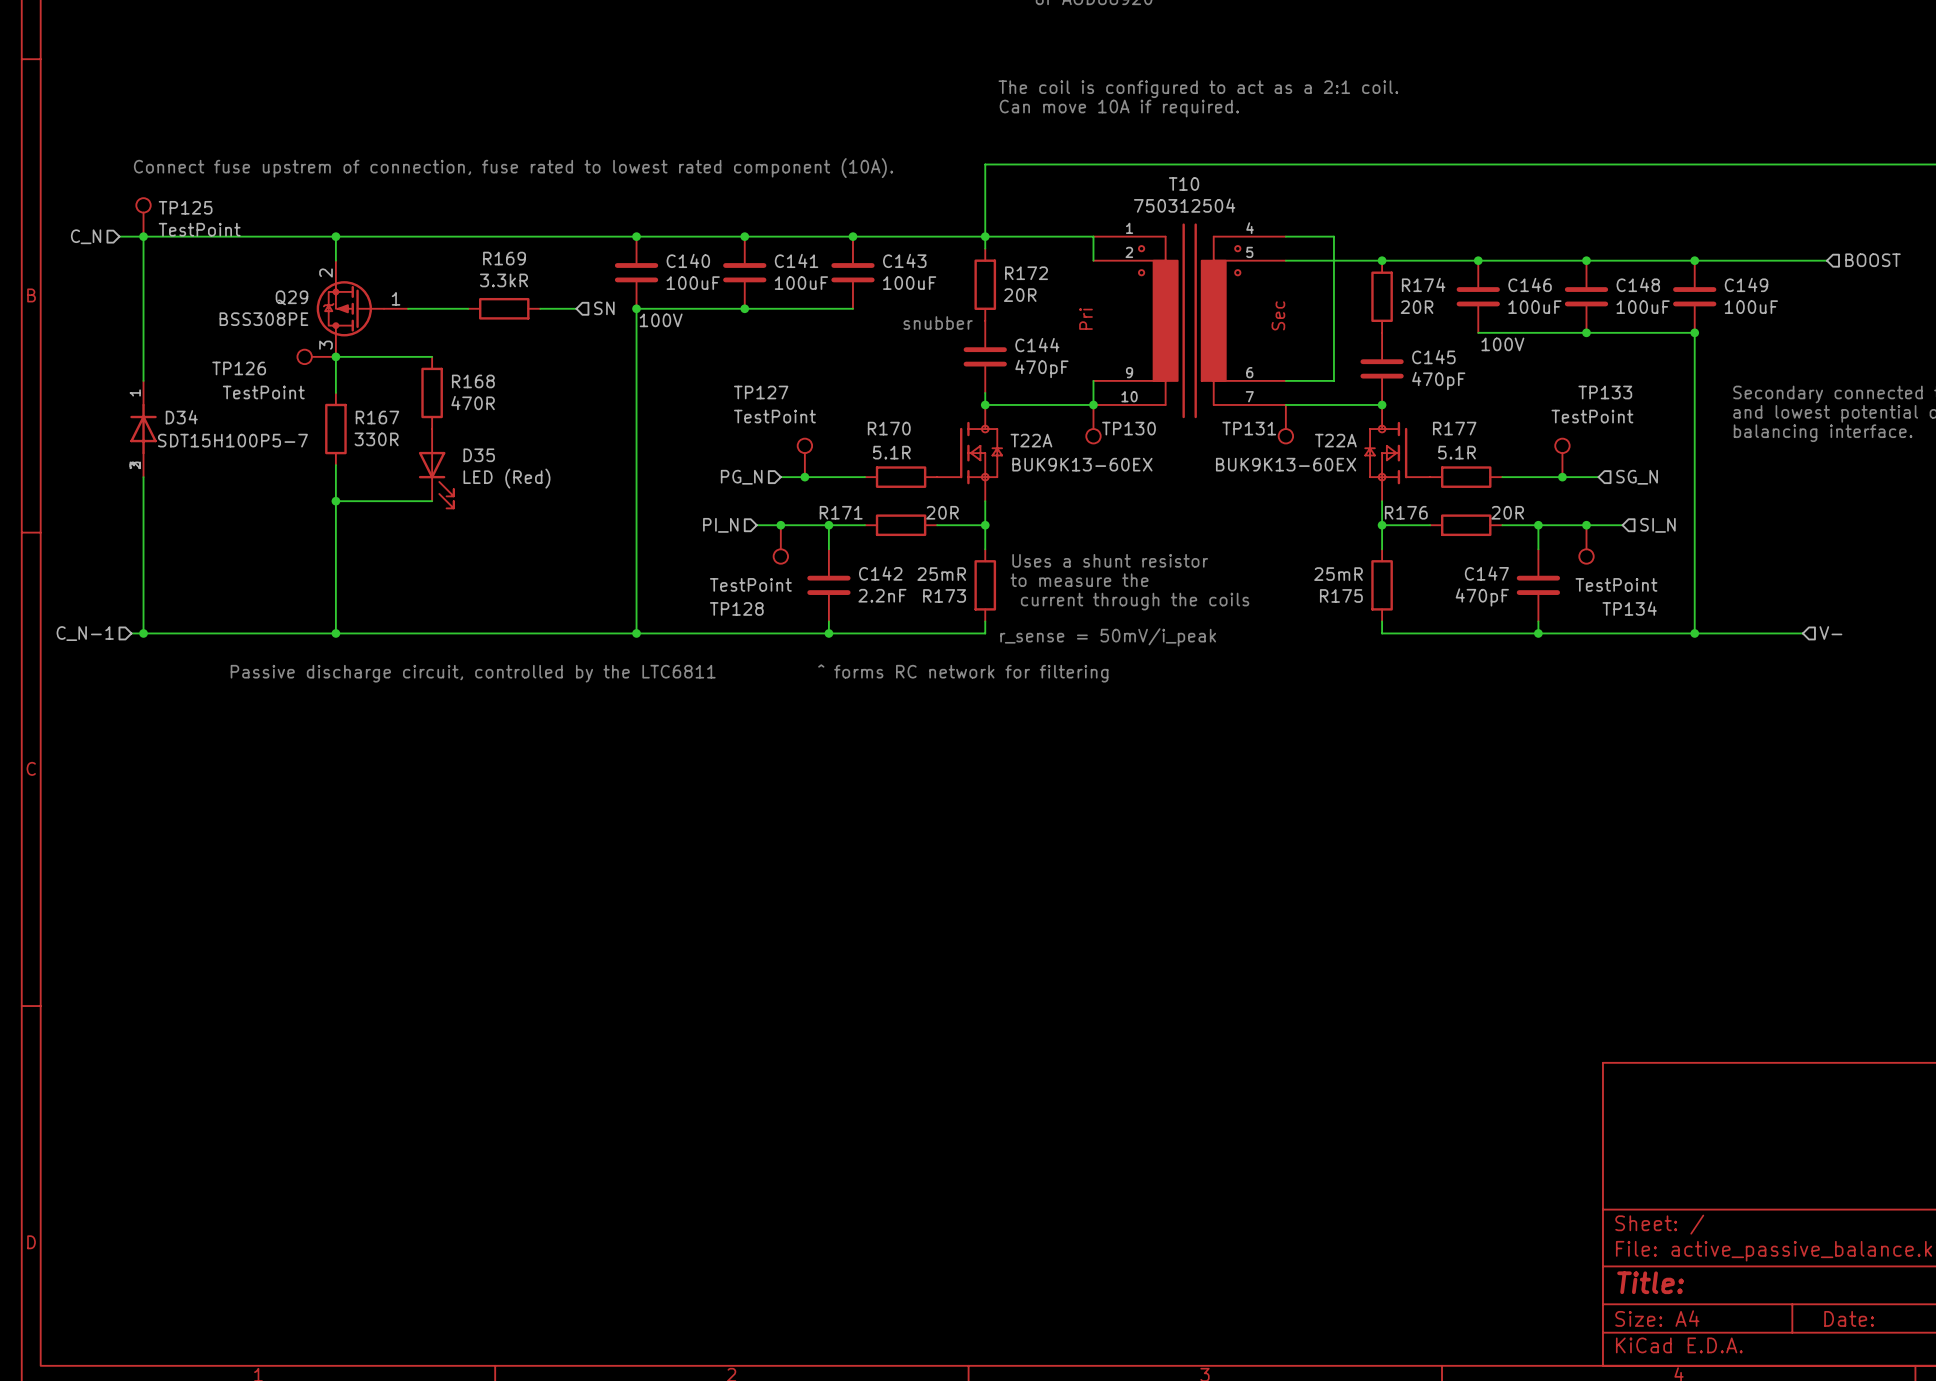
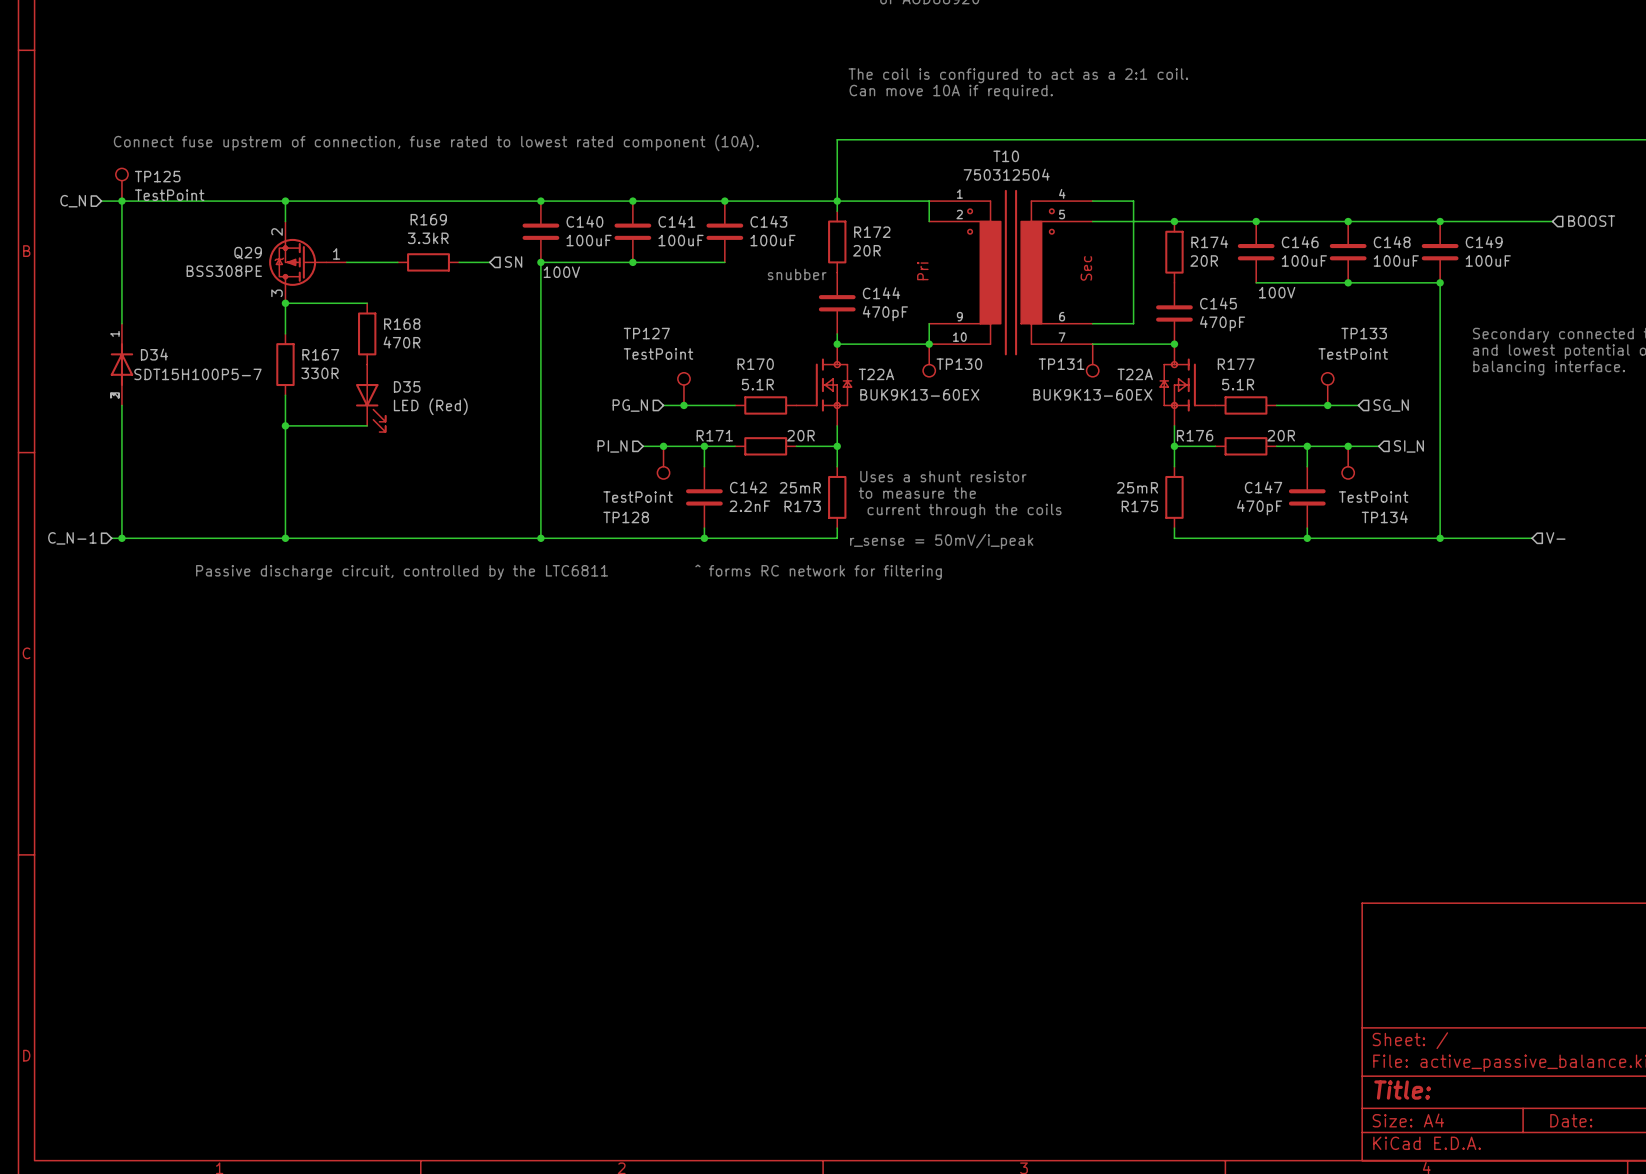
TP126: TestPoint (316, 356) -> none

